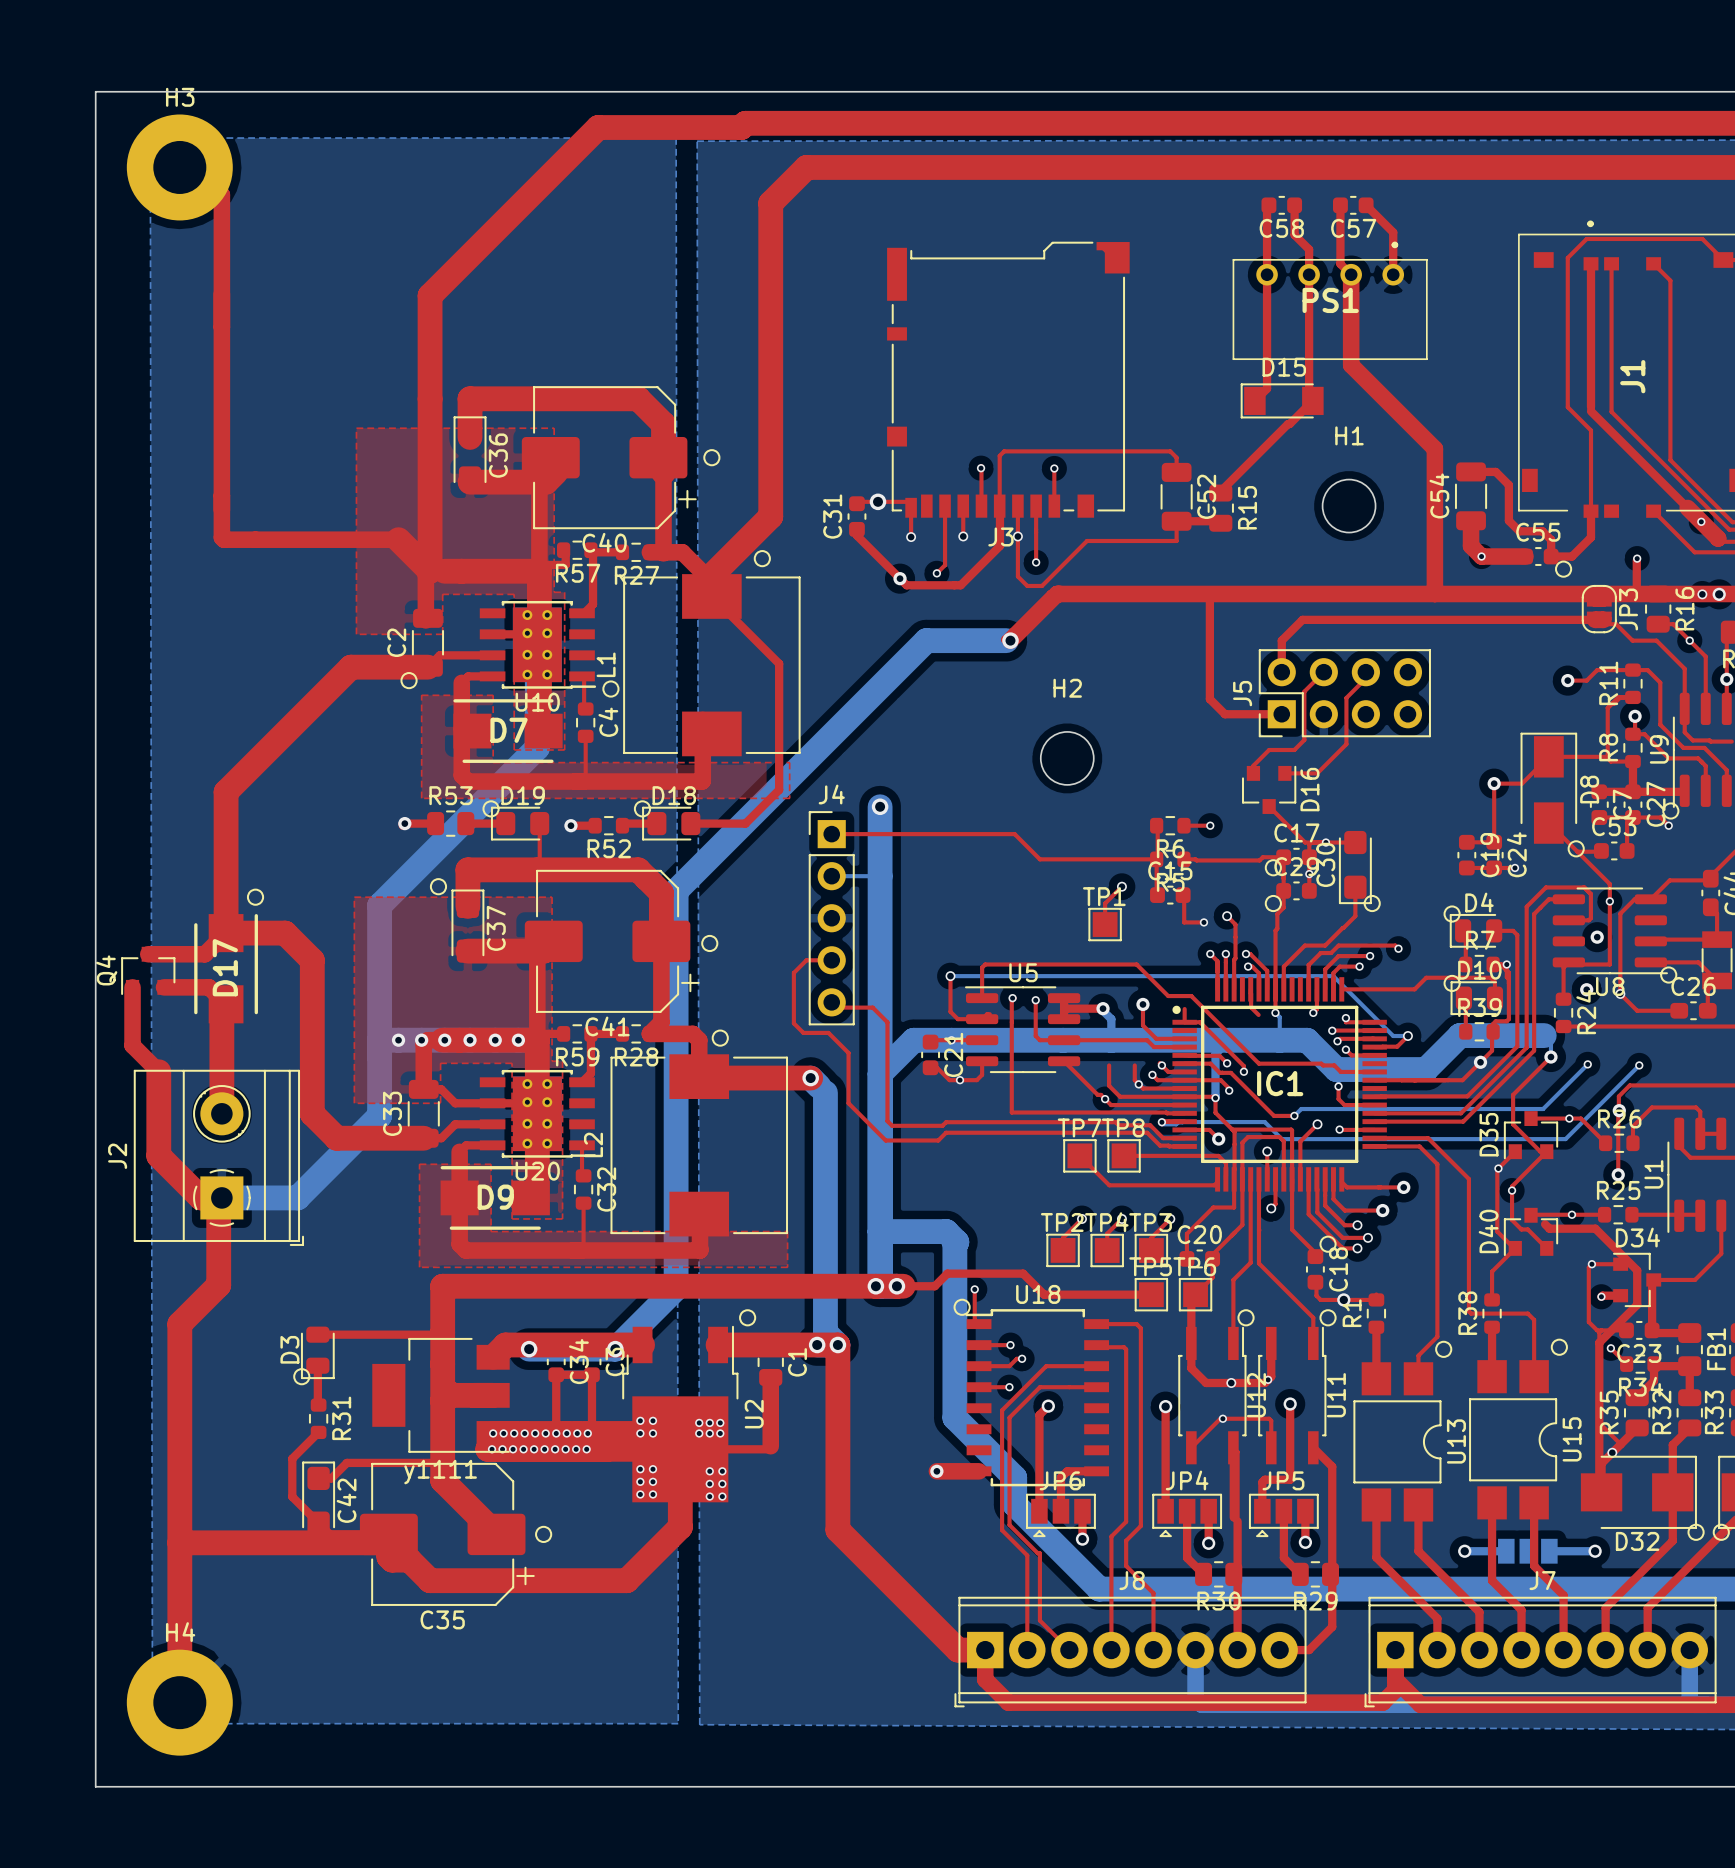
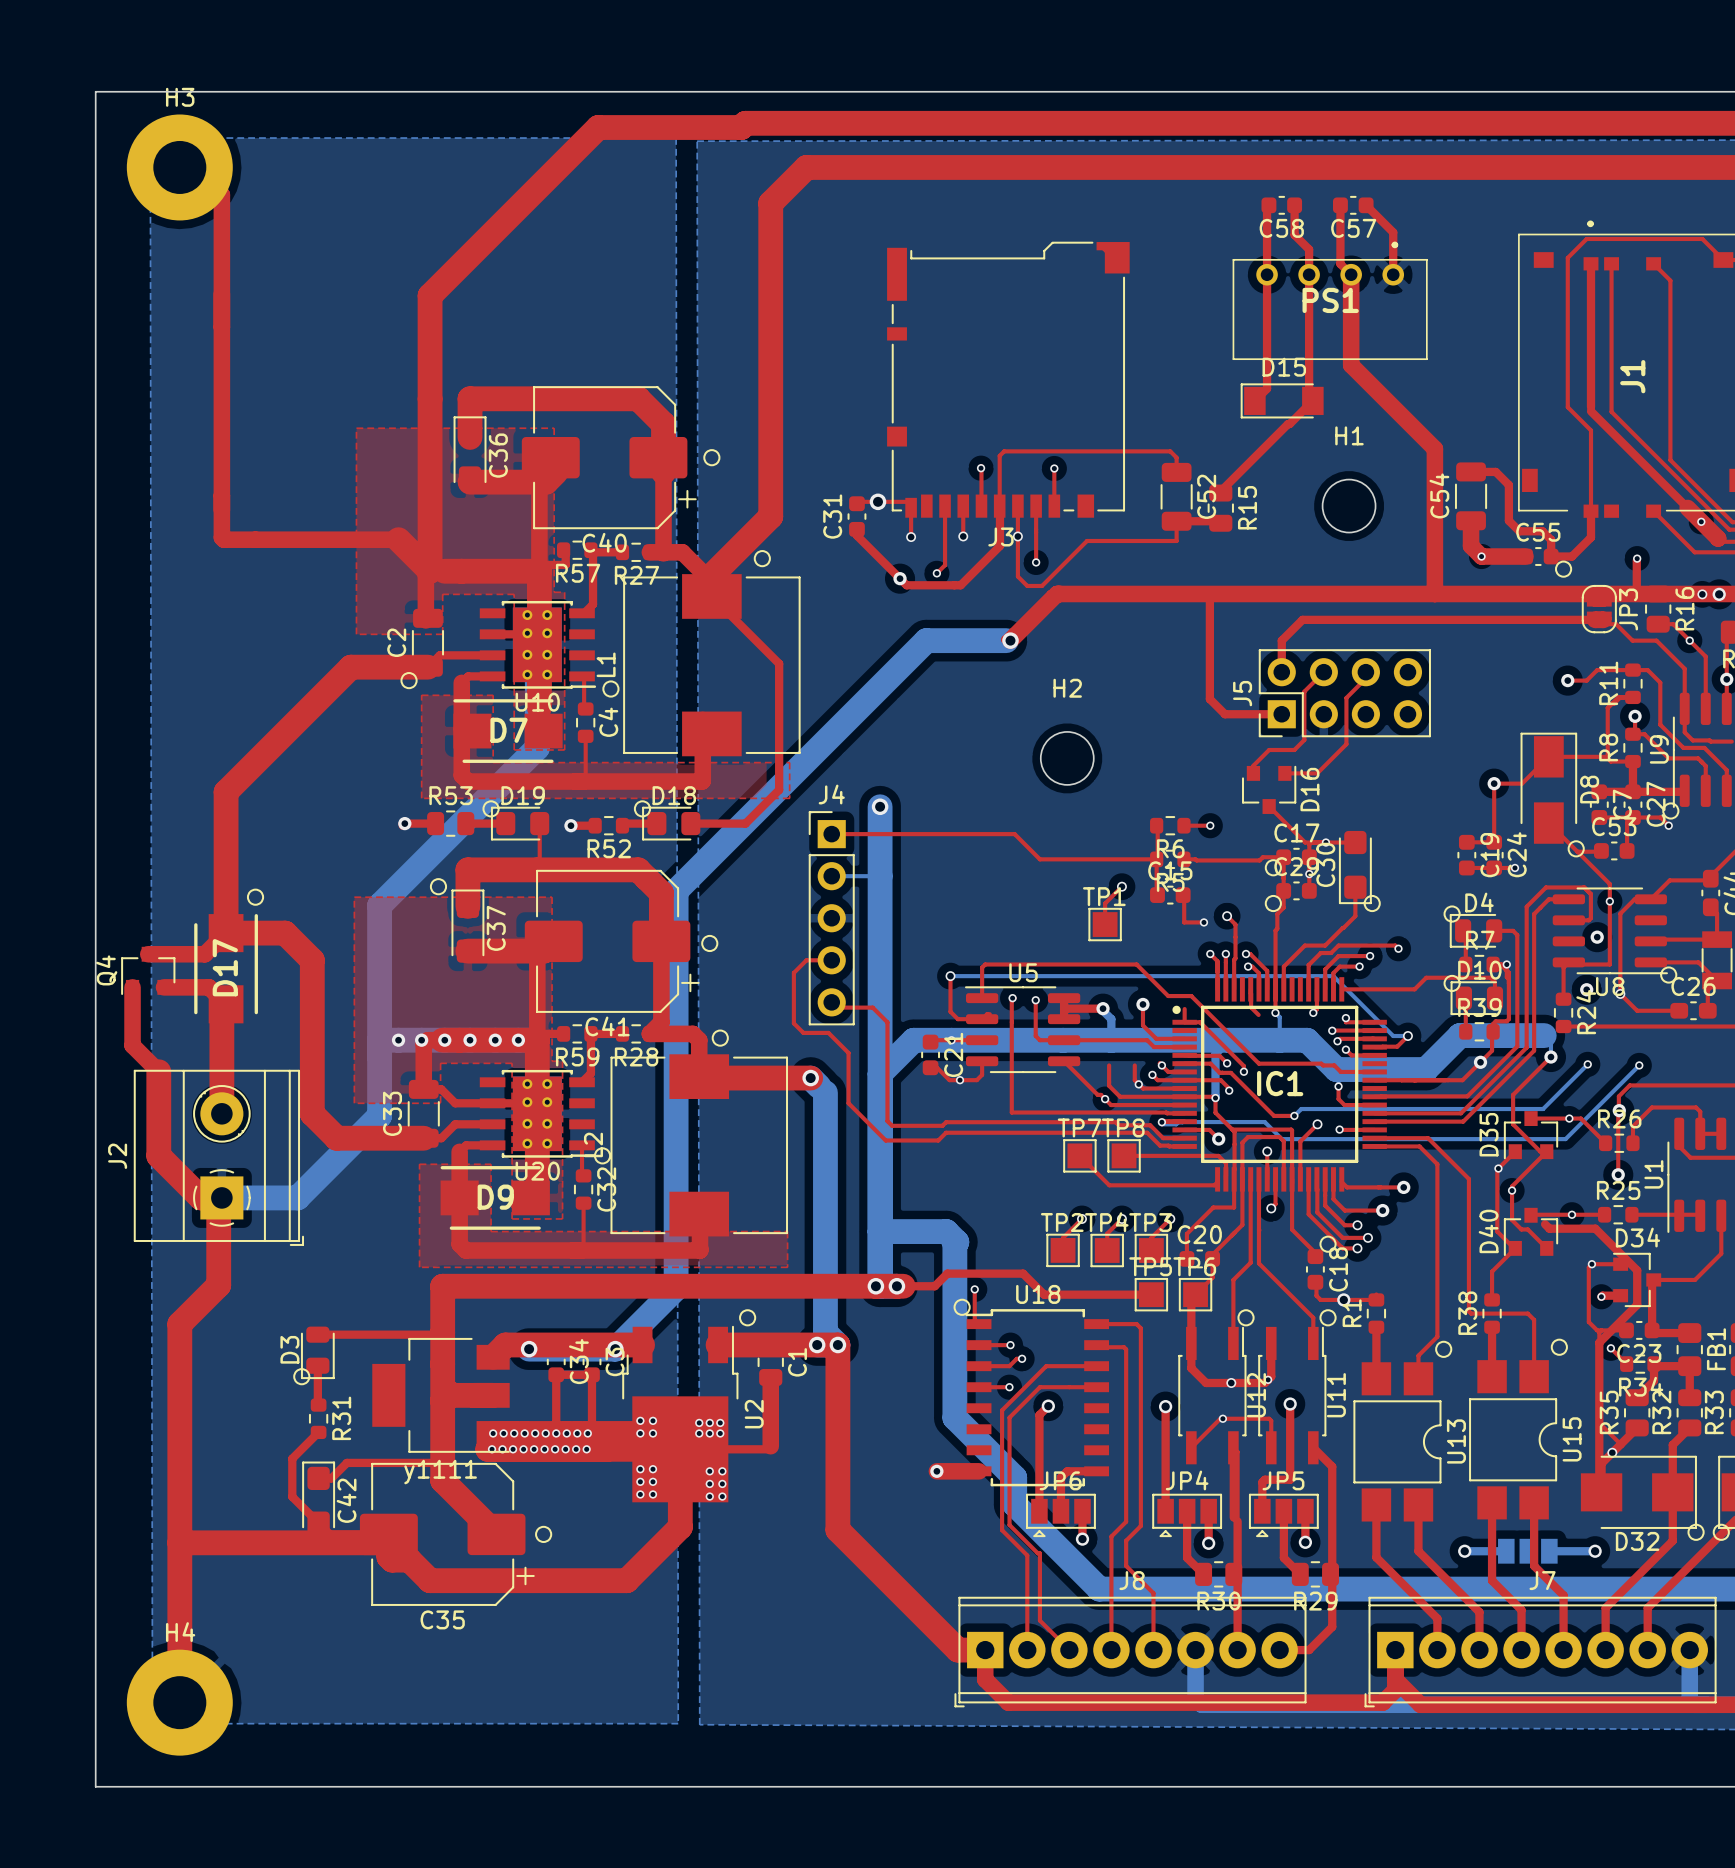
drawing: none -> [593, 1147, 612, 1165]

